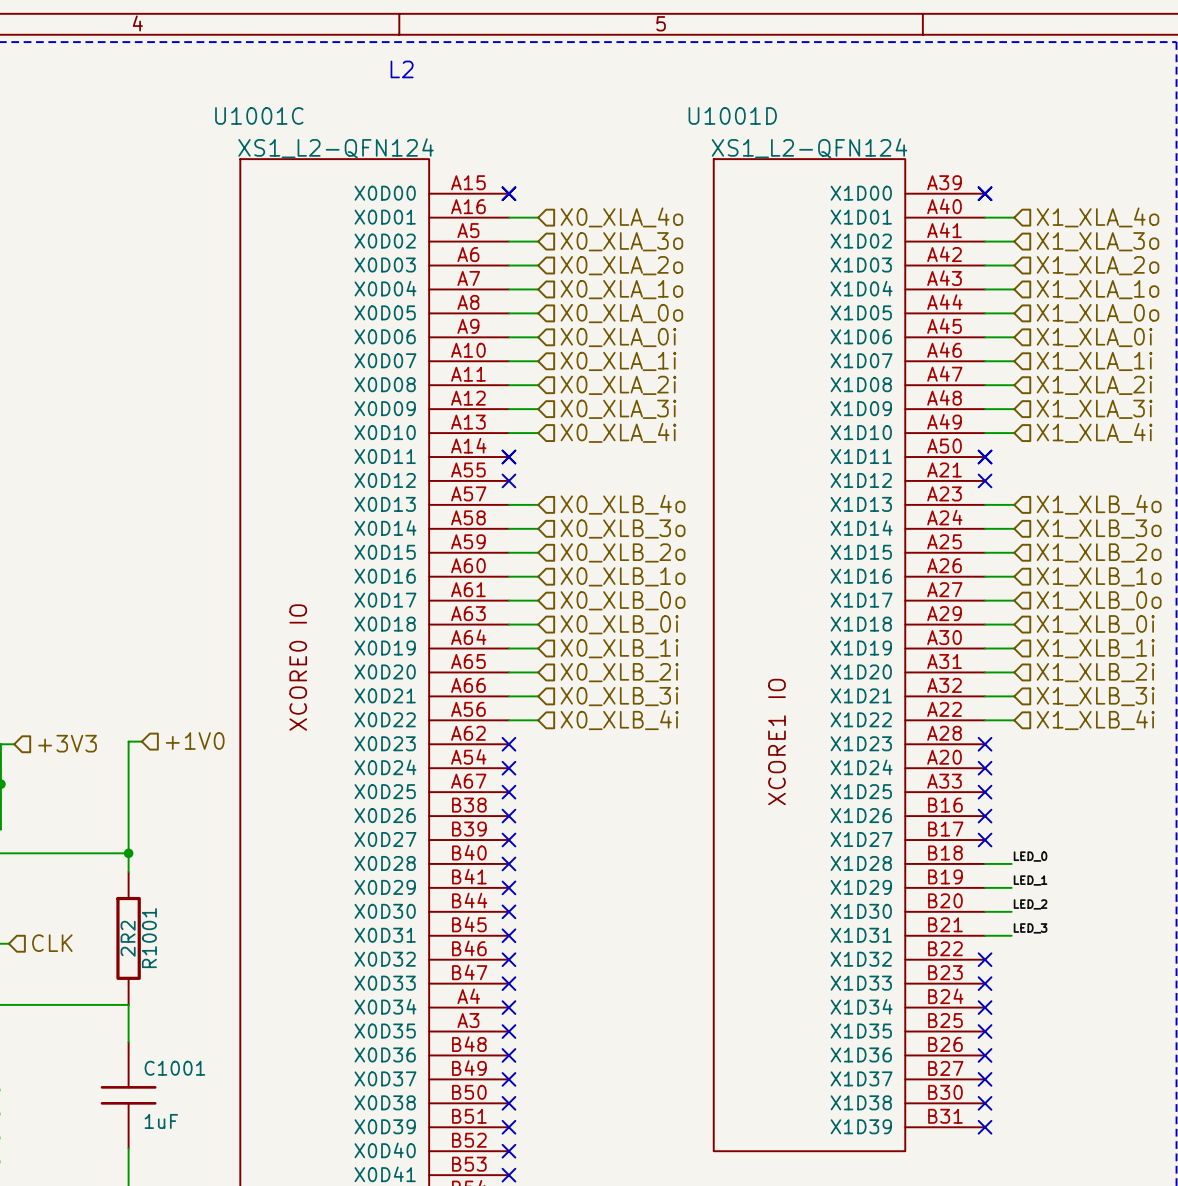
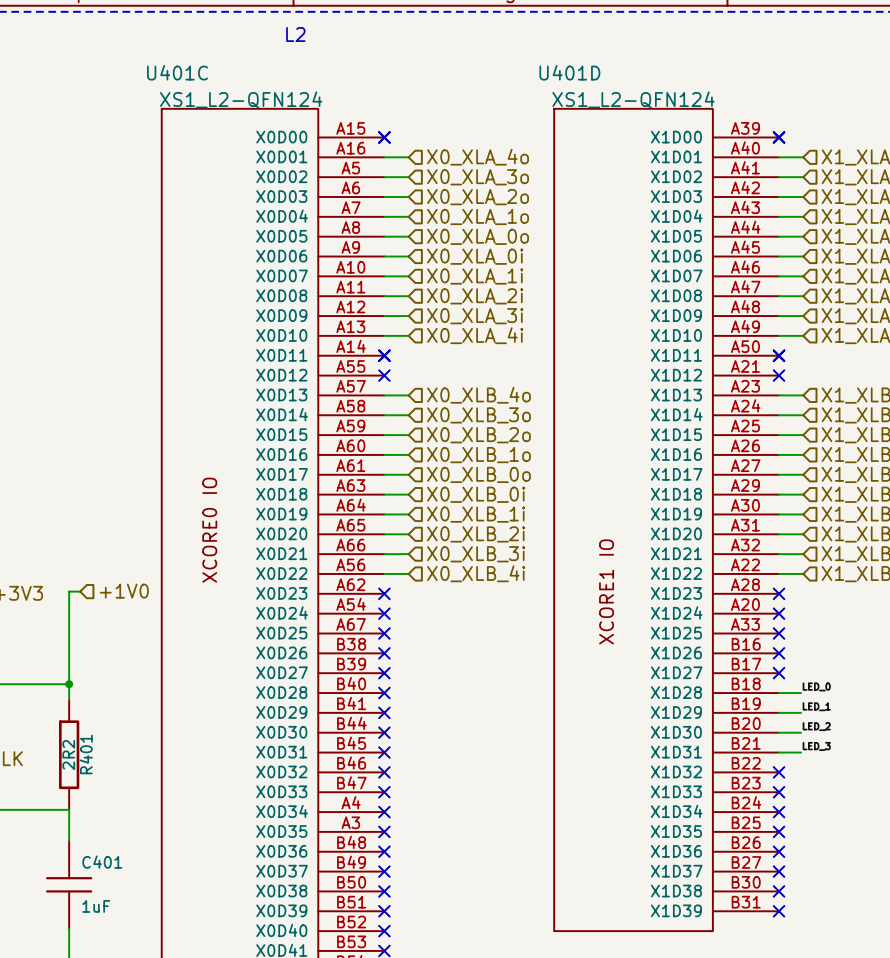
U1001C name: U1001C (259, 115) -> U401C (177, 72)
U1001D name: U1001D (732, 115) -> U401D (569, 72)
R1001 name: R1001 (149, 938) -> R401 (86, 754)
C1001 name: C1001 (174, 1068) -> C401 (102, 862)

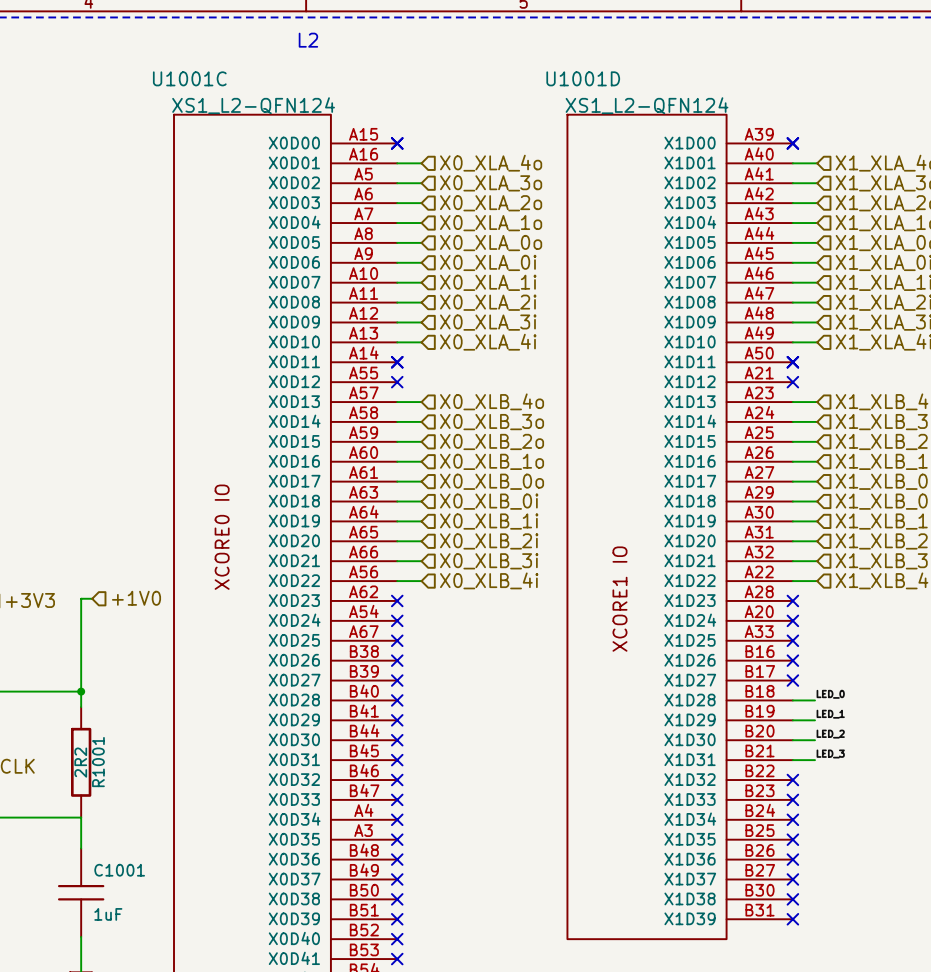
U401C name: U401C (177, 72) -> U1001C (189, 78)
U401D name: U401D (569, 72) -> U1001D (583, 78)
R401 name: R401 (86, 754) -> R1001 (98, 762)
C401 name: C401 (102, 862) -> C1001 (119, 870)

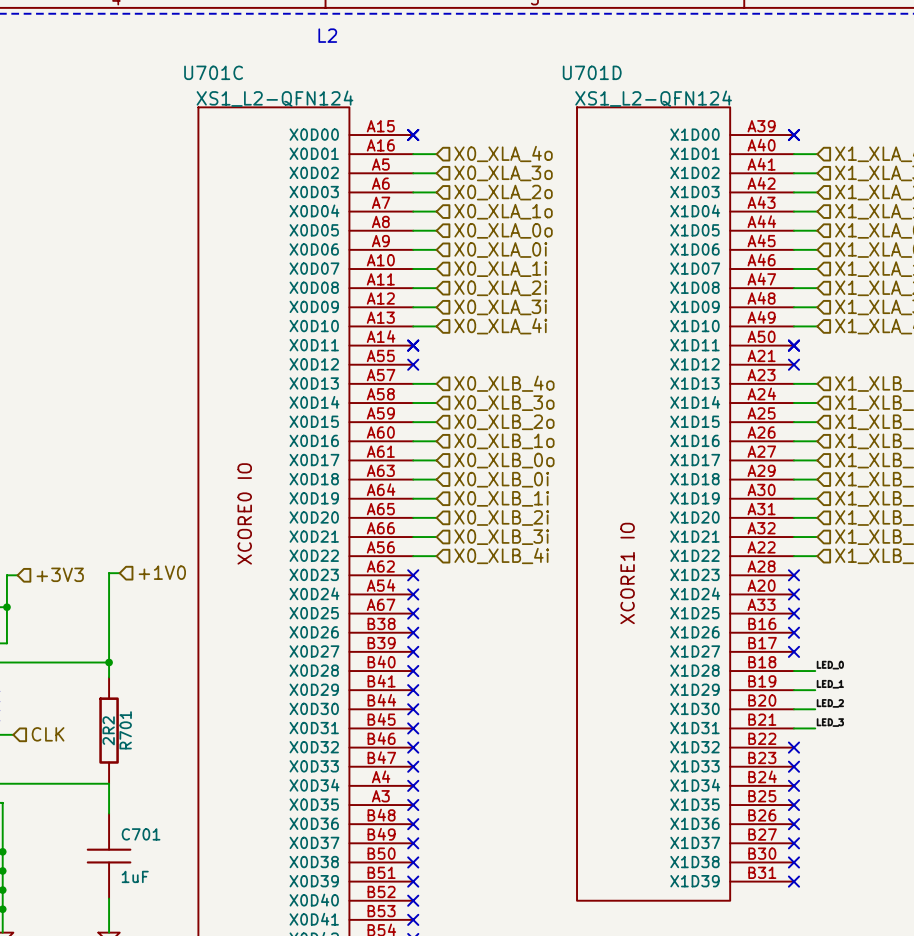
U1001C name: U1001C (189, 78) -> U701C (213, 72)
U1001D name: U1001D (583, 78) -> U701D (592, 72)
R1001 name: R1001 (98, 762) -> R701 (125, 730)
C1001 name: C1001 (119, 870) -> C701 (141, 834)

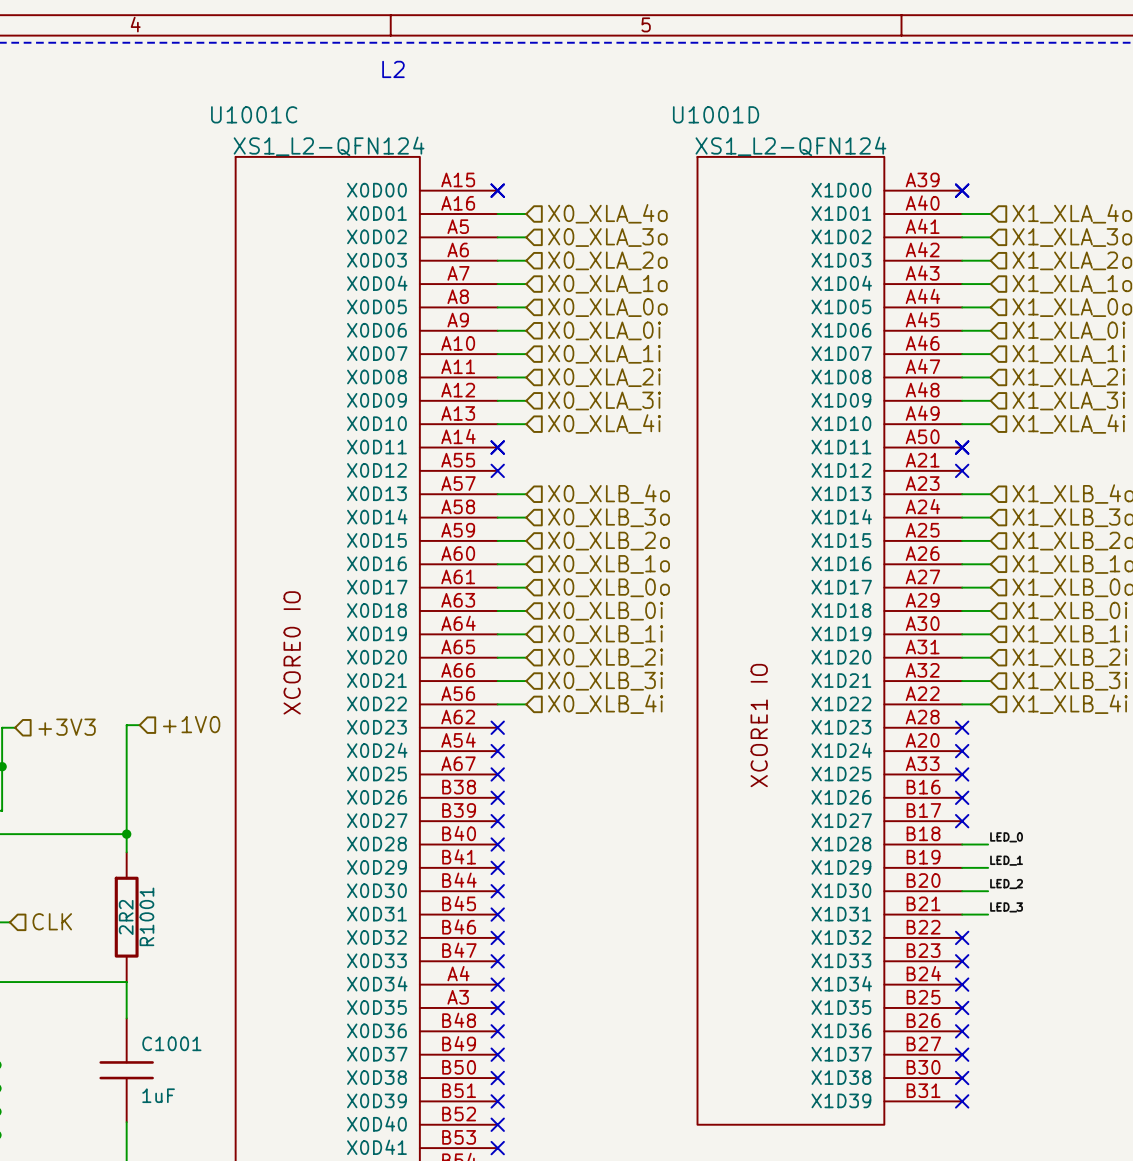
U701C name: U701C (213, 72) -> U1001C (254, 114)
U701D name: U701D (592, 72) -> U1001D (716, 114)
R701 name: R701 (125, 730) -> R1001 (146, 916)
C701 name: C701 (141, 834) -> C1001 (171, 1043)

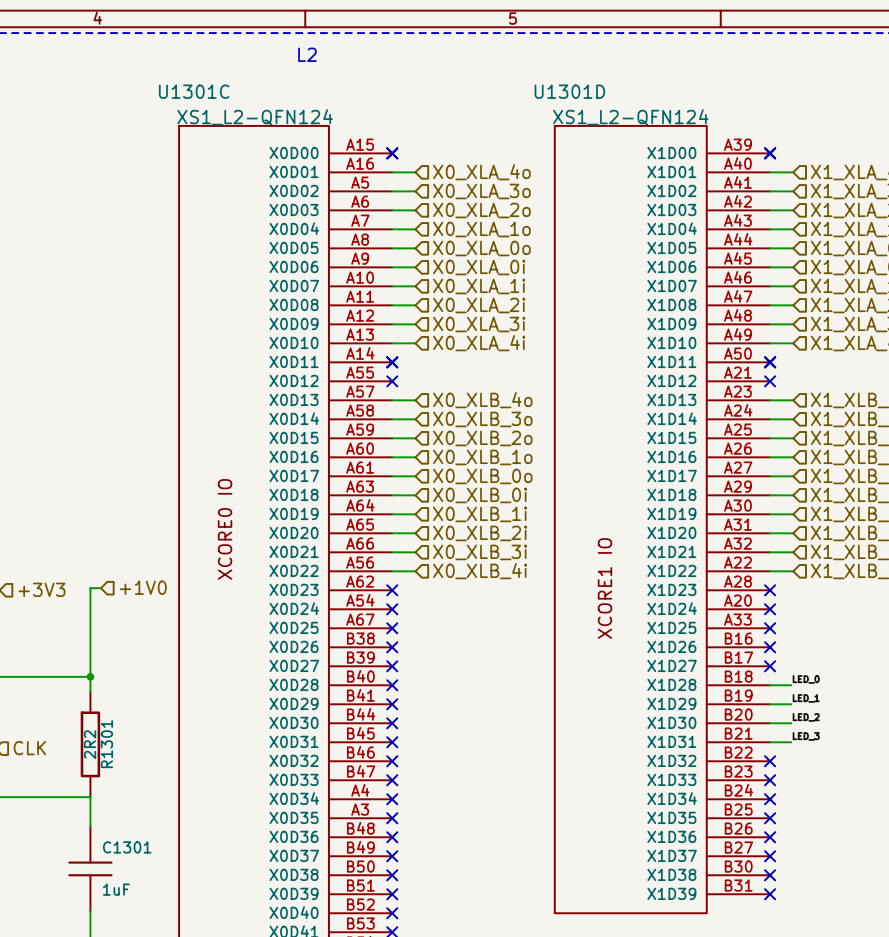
U1001C name: U1001C (254, 114) -> U1301C (194, 91)
U1001D name: U1001D (716, 114) -> U1301D (569, 91)
R1001 name: R1001 (146, 916) -> R1301 (106, 744)
C1001 name: C1001 (171, 1043) -> C1301 (127, 847)

